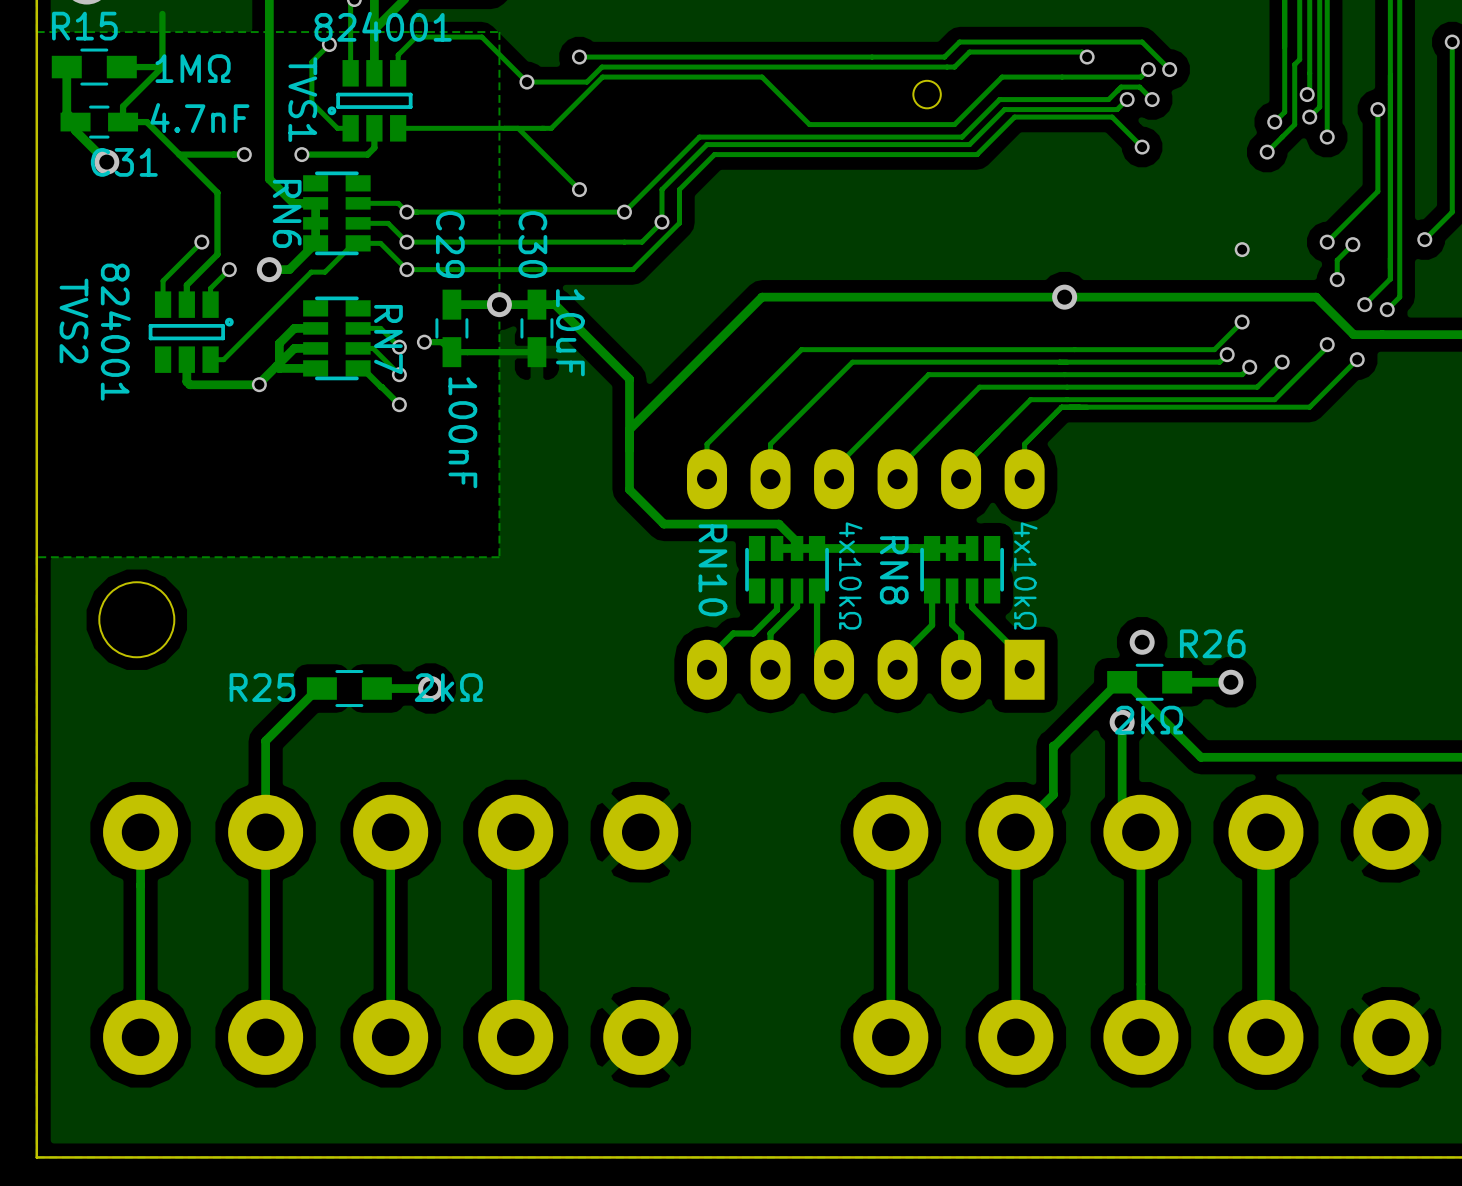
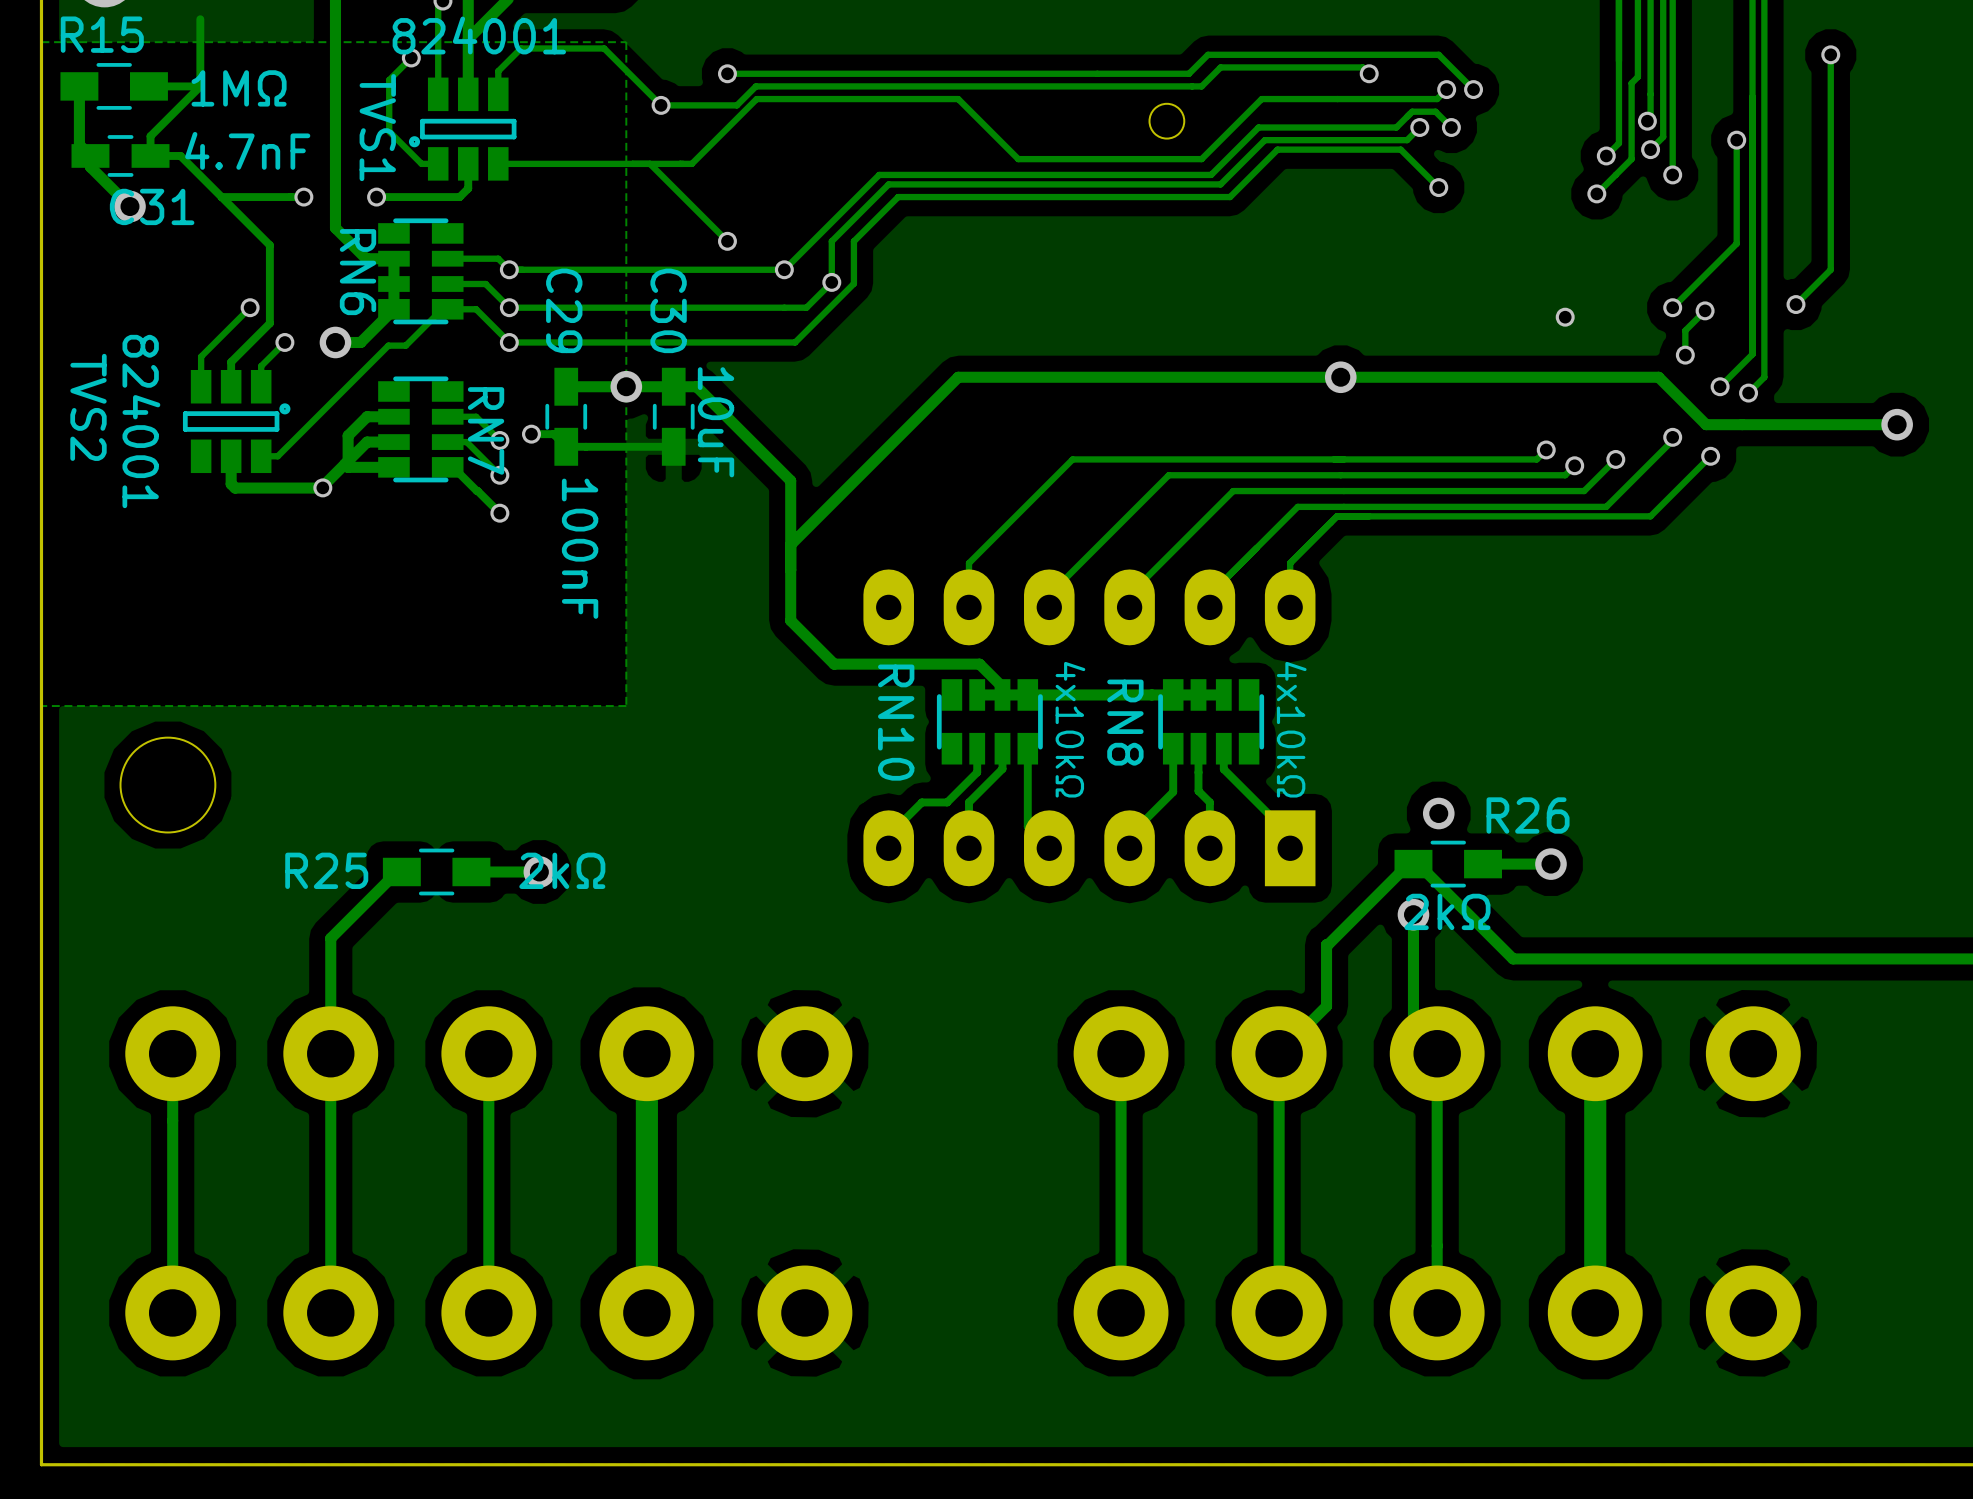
track: (1242, 322) (1214, 349) (801, 349) (707, 444) (707, 469) -> none
via: (1242, 322) -> none

